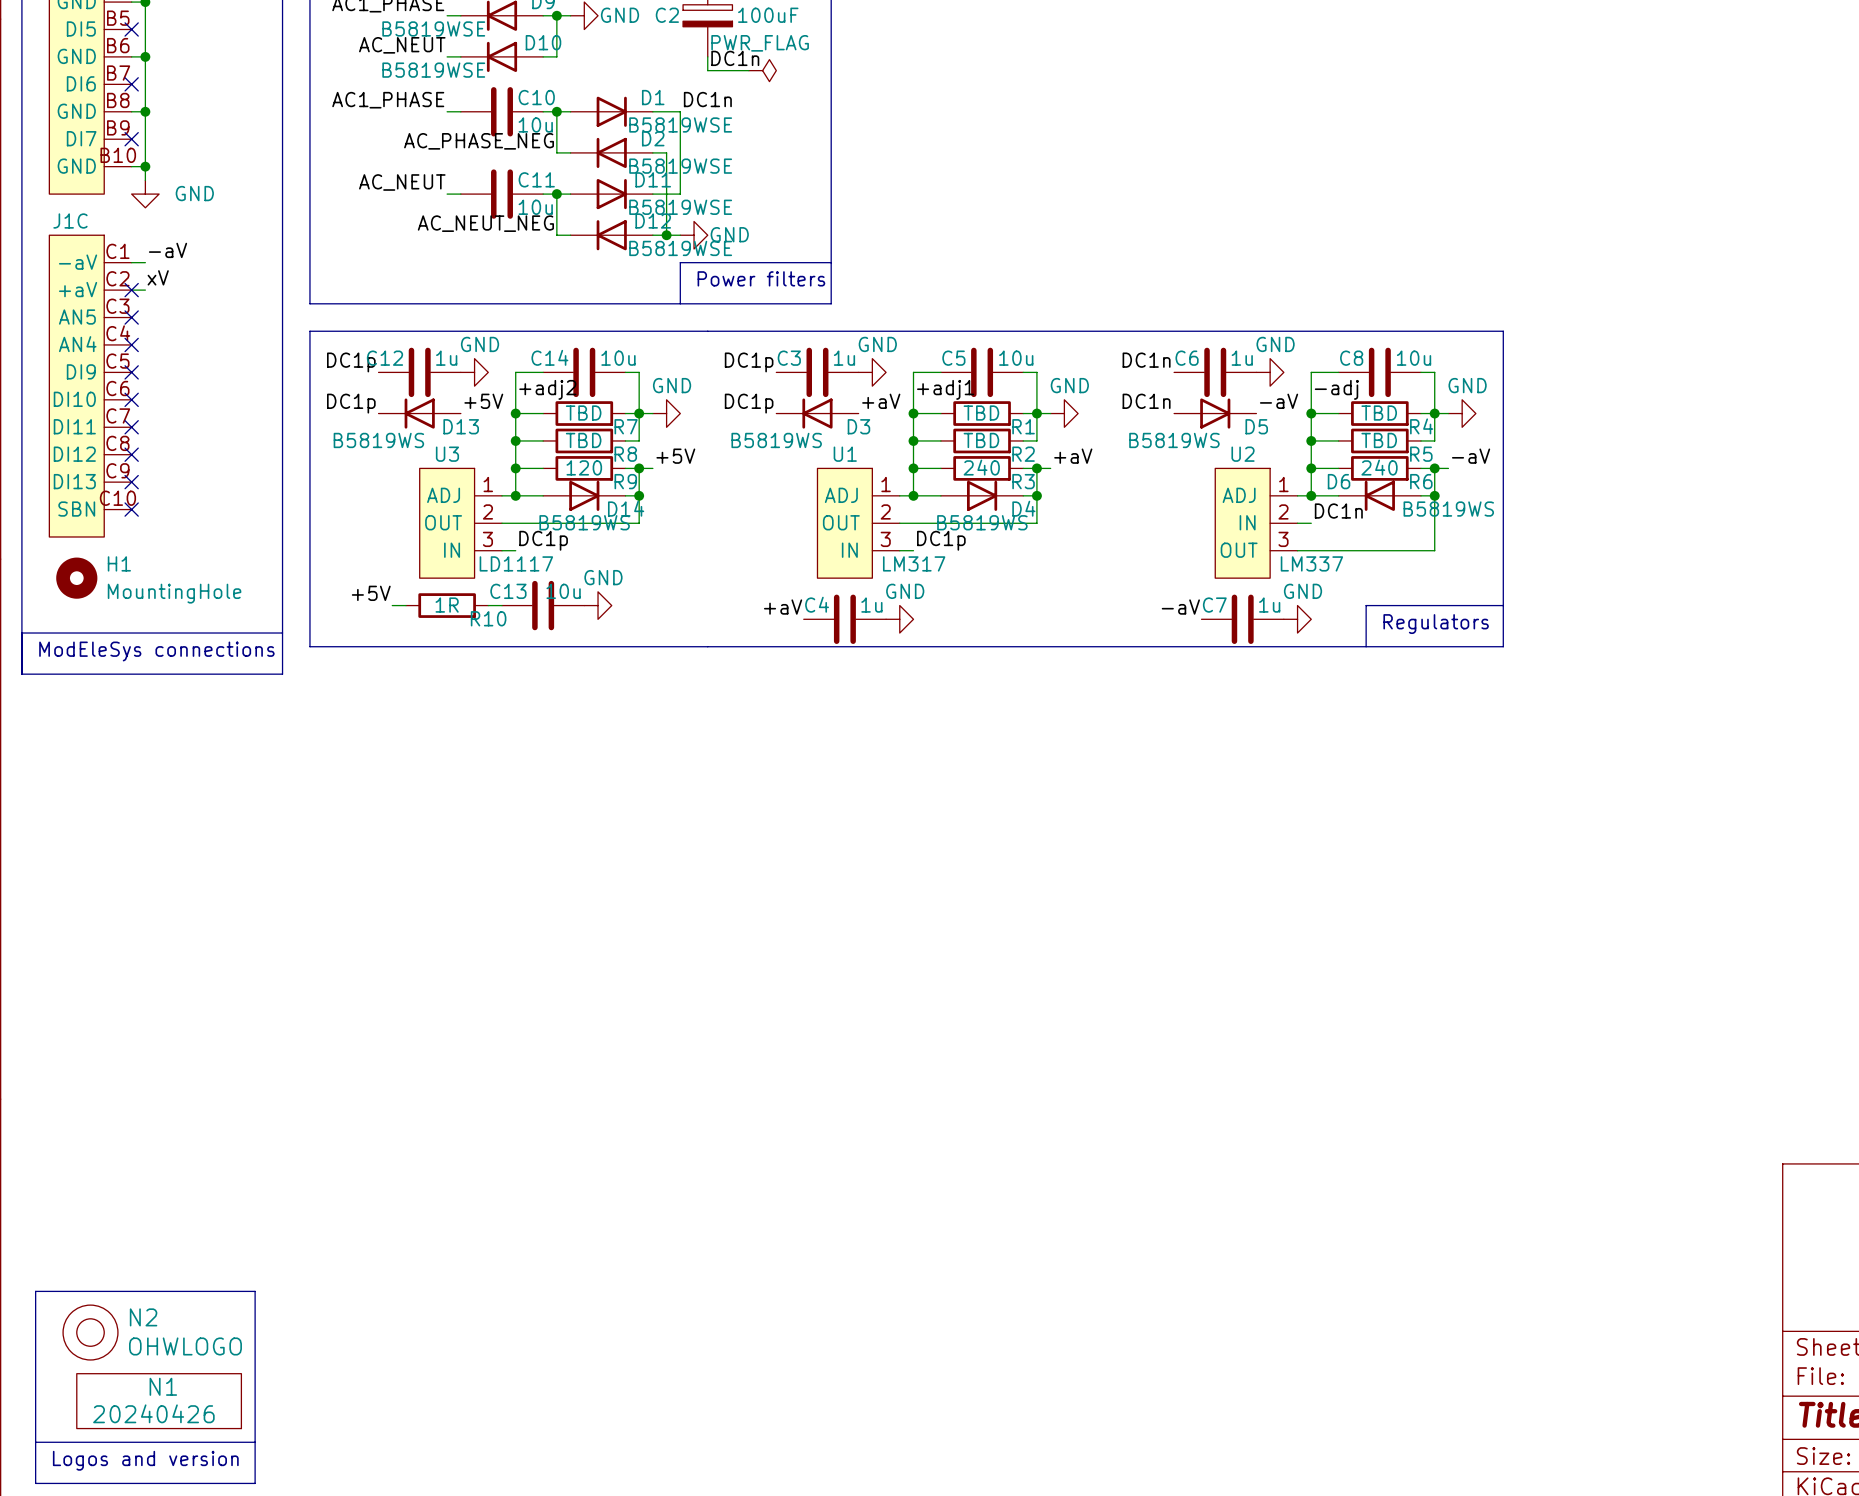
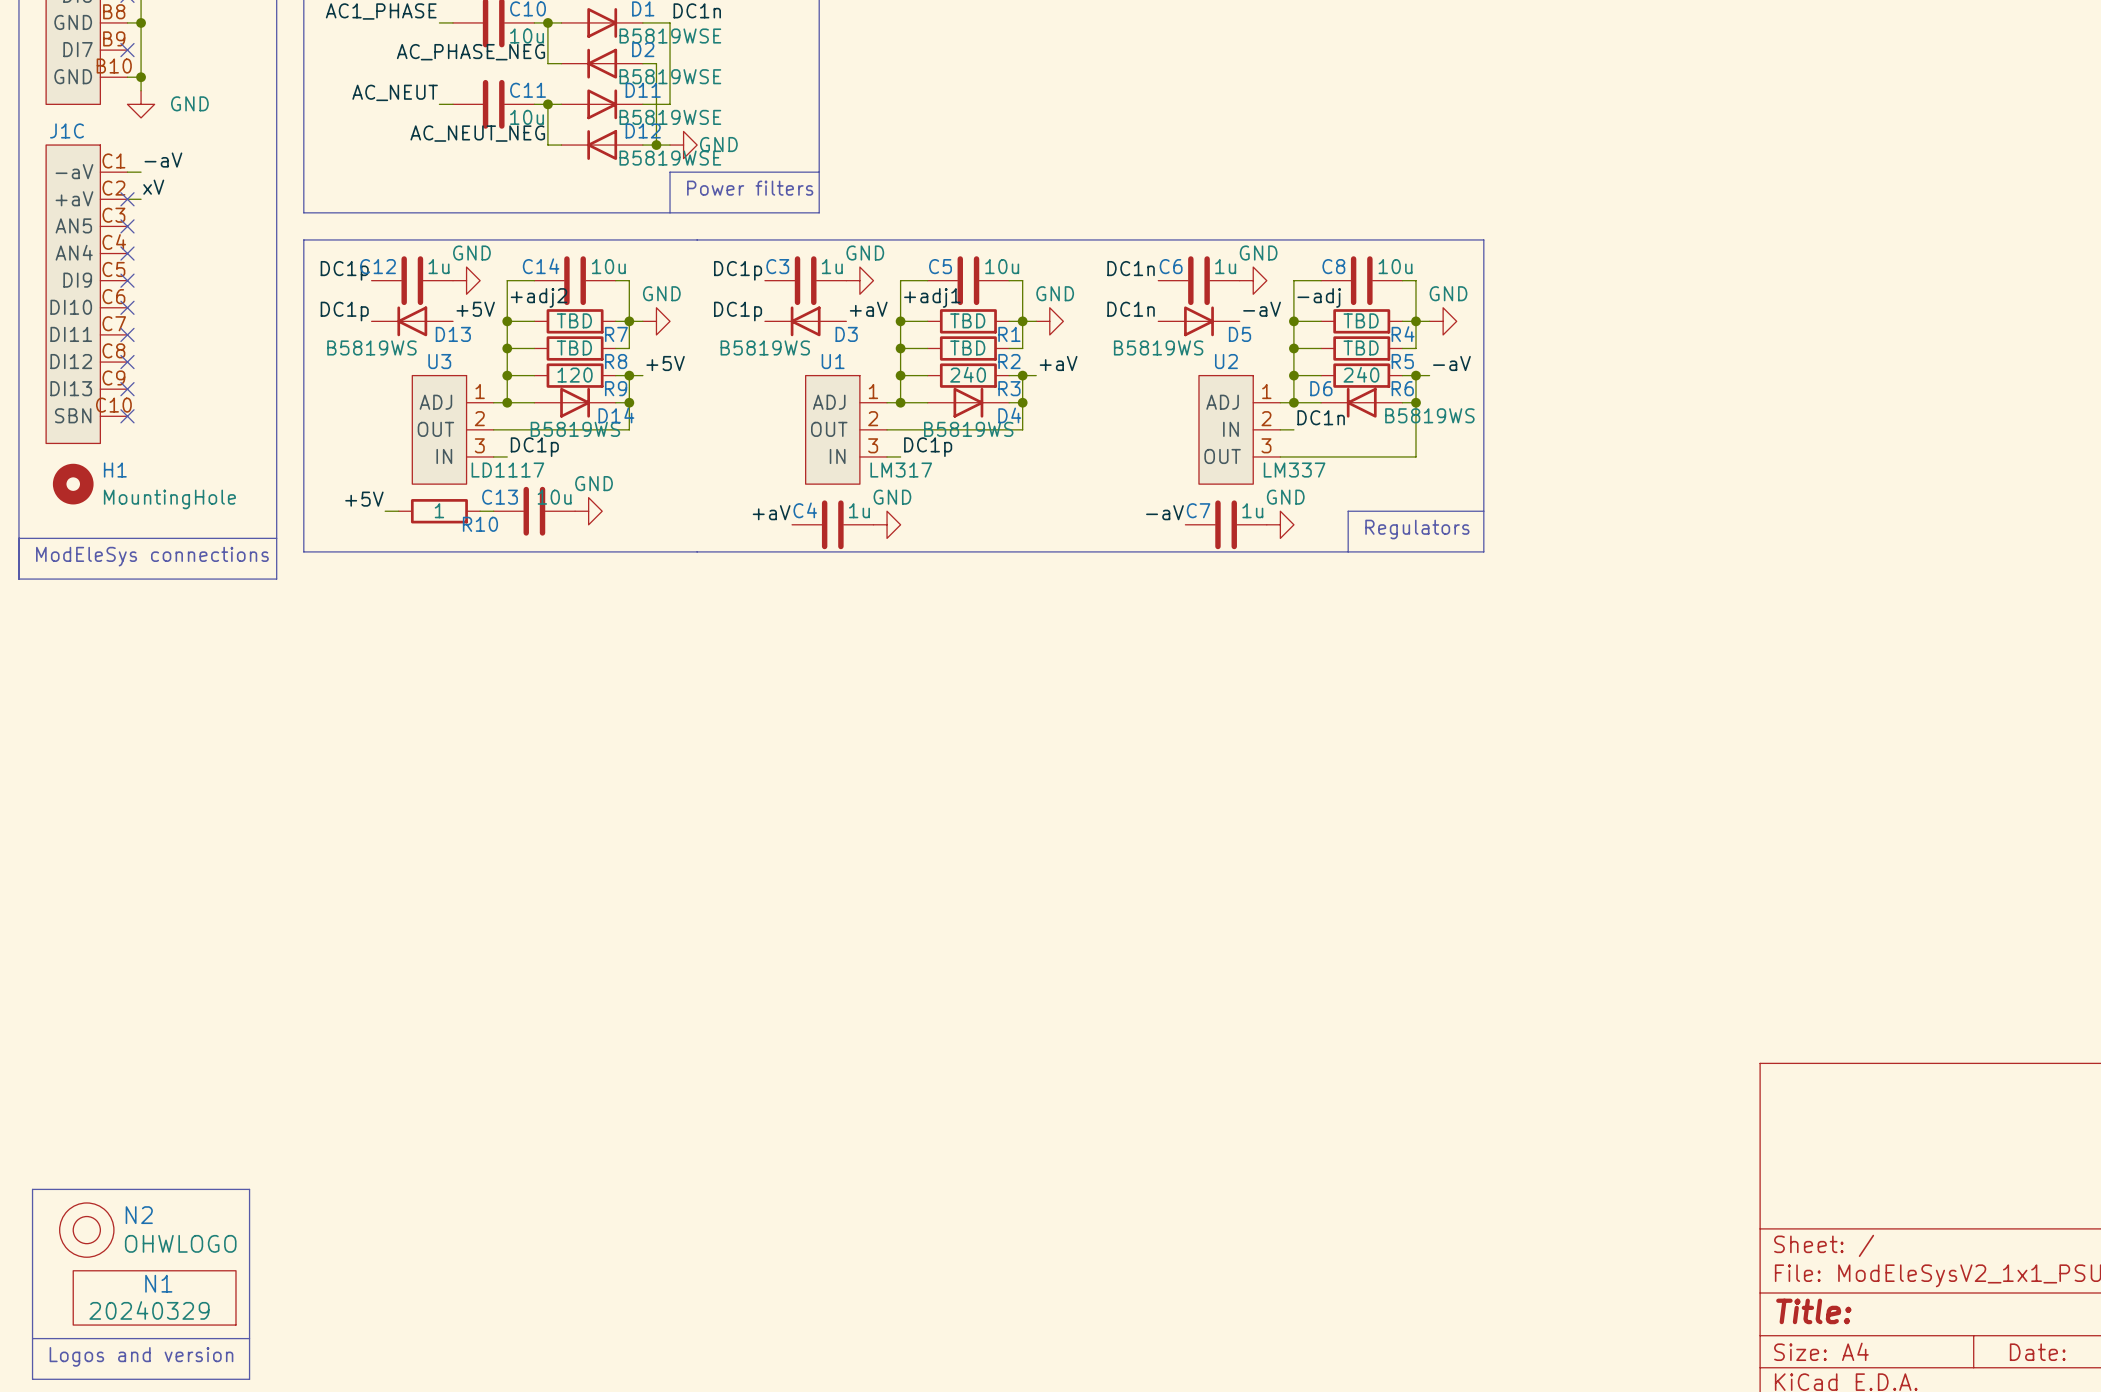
R10 value: 1R (447, 605) -> 1 (439, 510)
N1 value: 20240426 (153, 1413) -> 20240329 (149, 1310)

